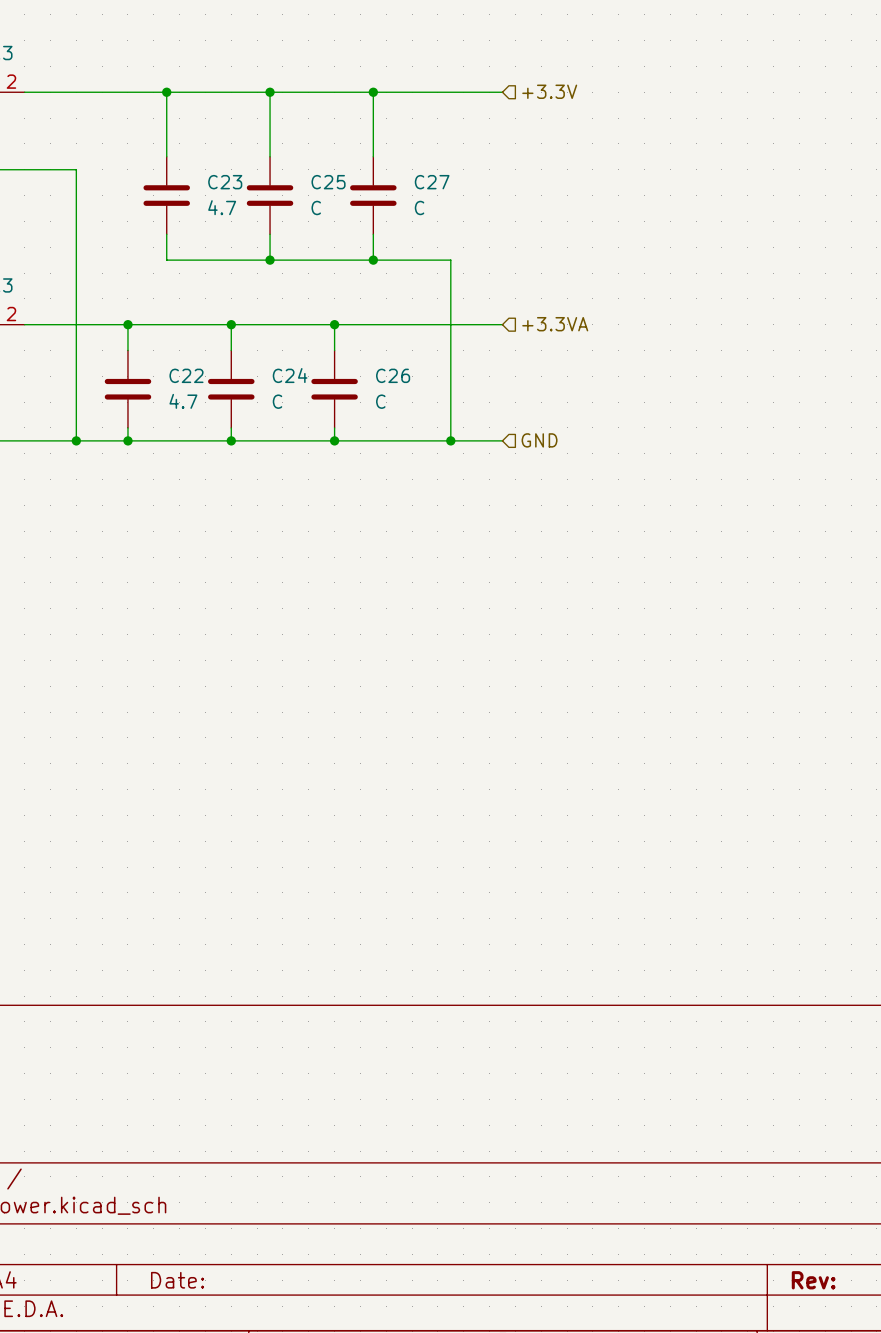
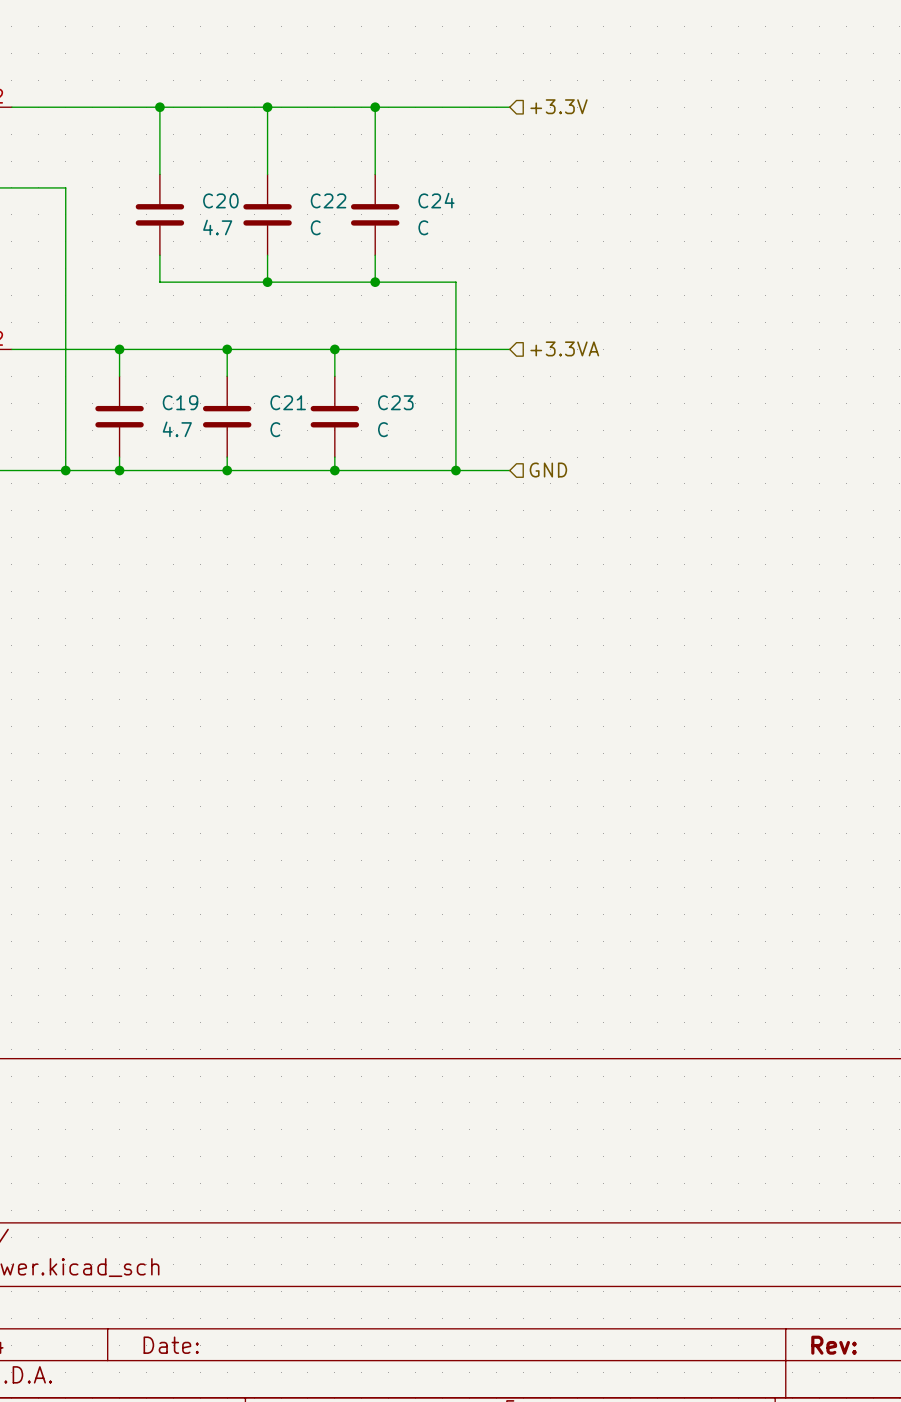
C23 name: C23 (225, 182) -> C20 (220, 200)
C25 name: C25 (328, 182) -> C22 (328, 200)
C27 name: C27 (432, 182) -> C24 (436, 200)
C22 name: C22 (186, 375) -> C19 (180, 402)
C24 name: C24 (290, 375) -> C21 (288, 402)
C26 name: C26 (393, 375) -> C23 (395, 402)

